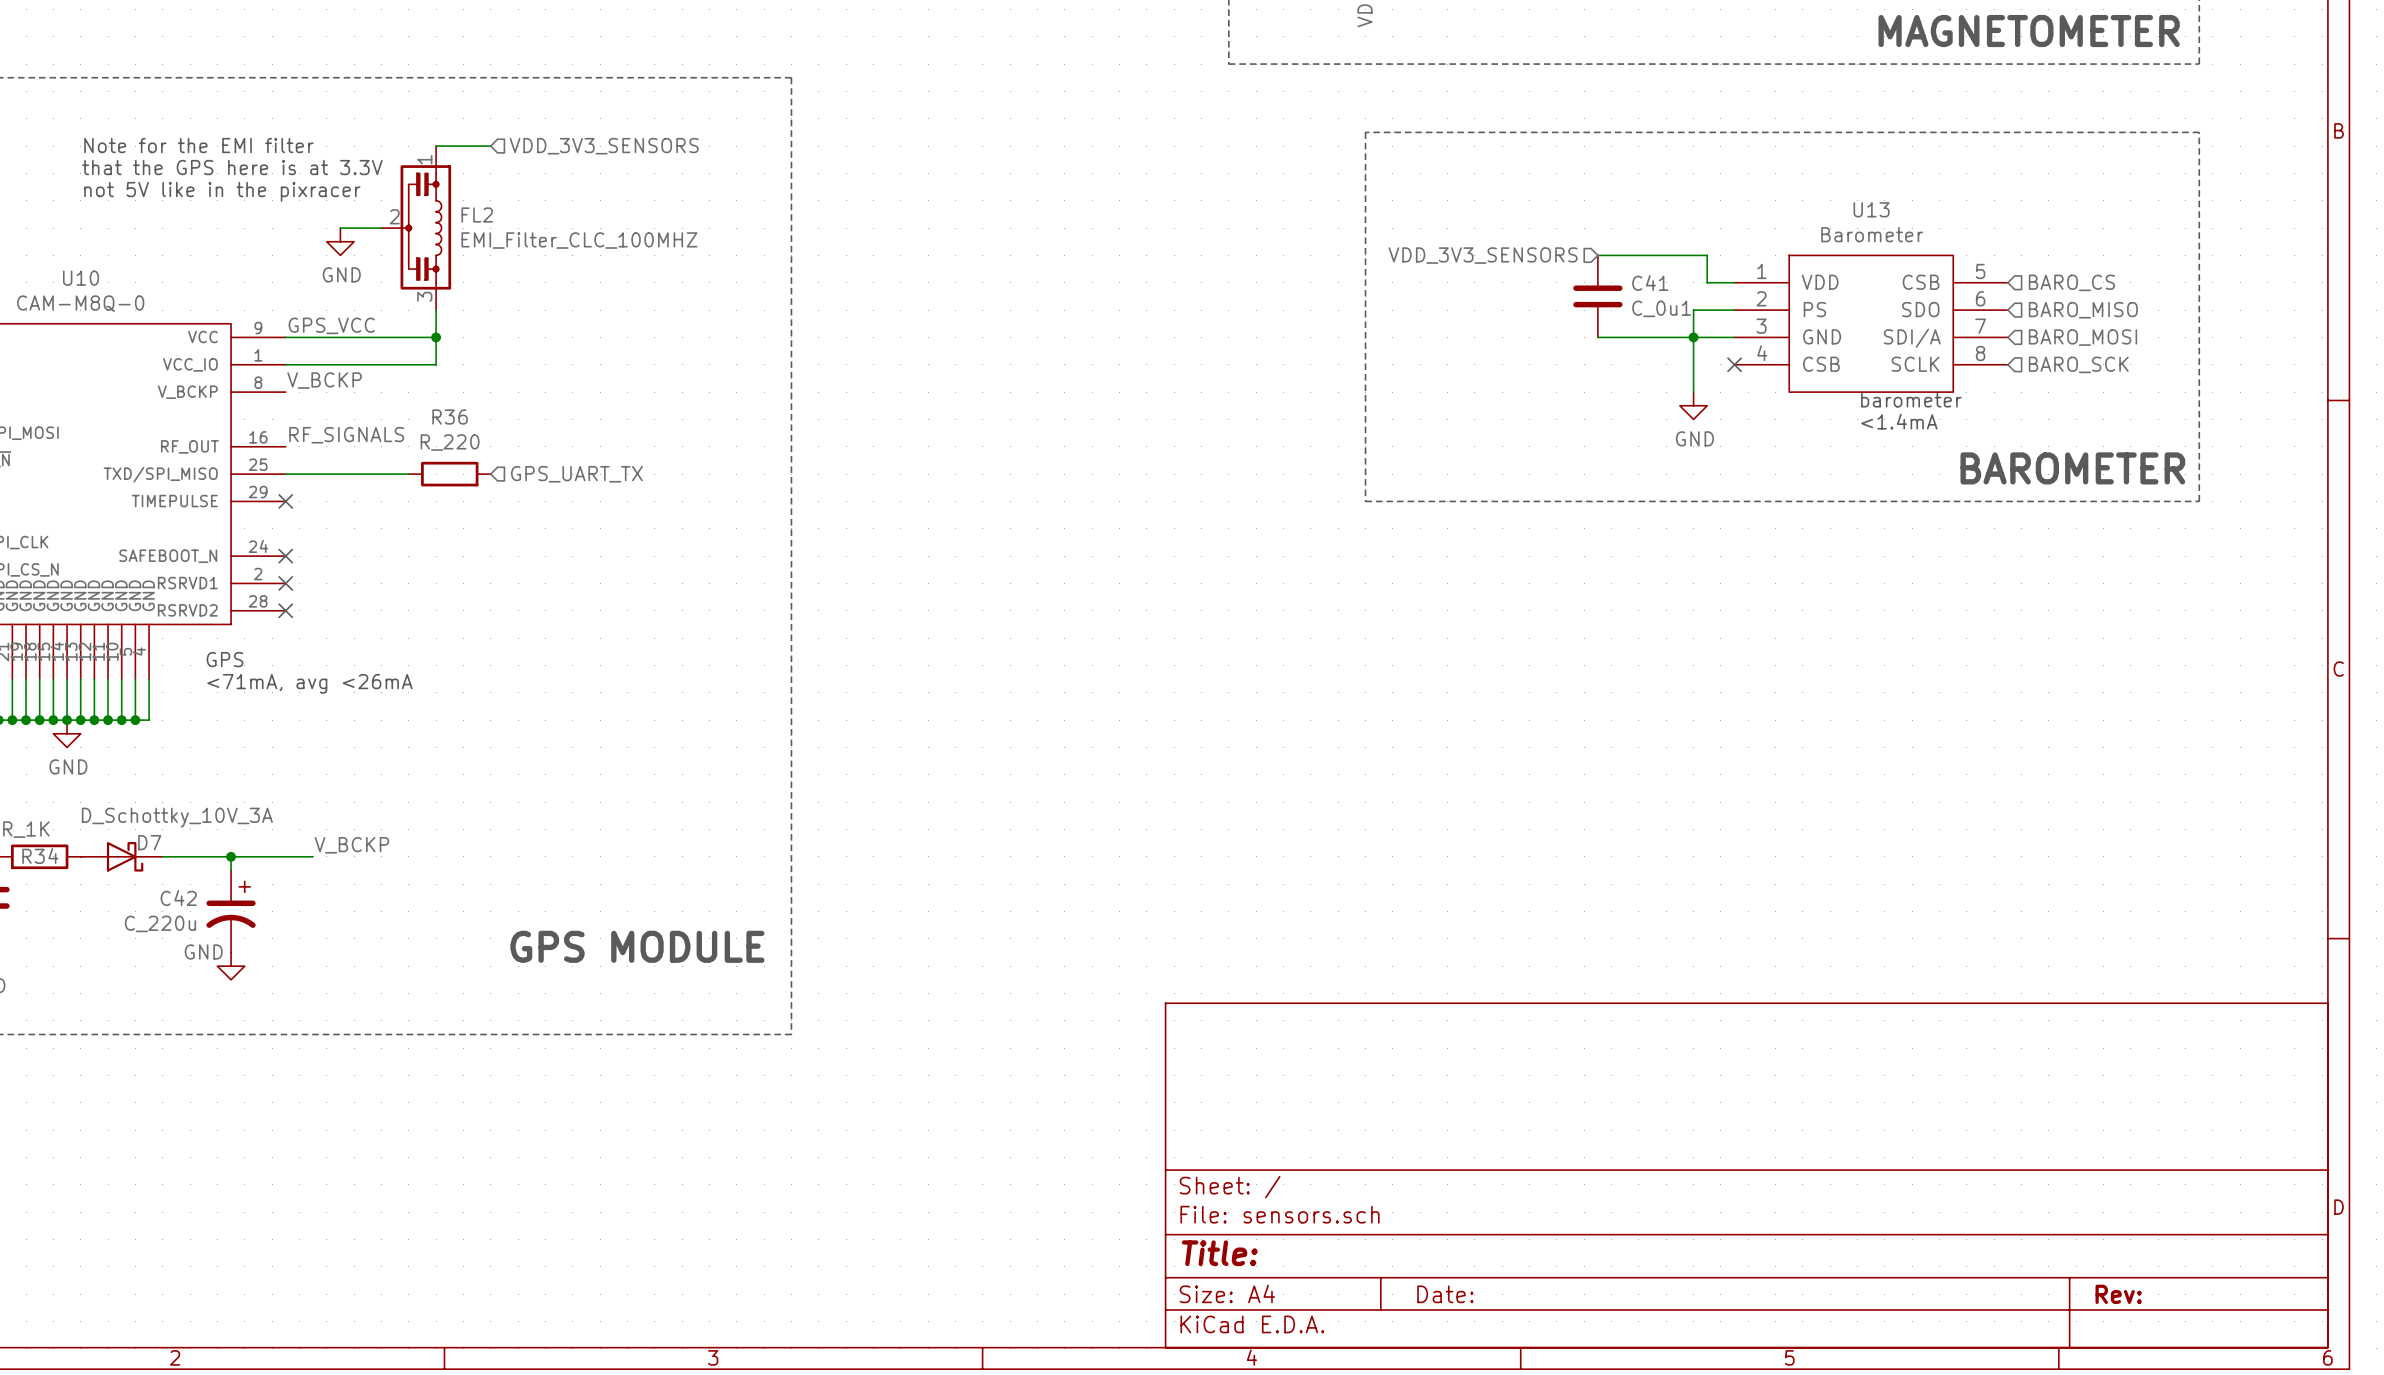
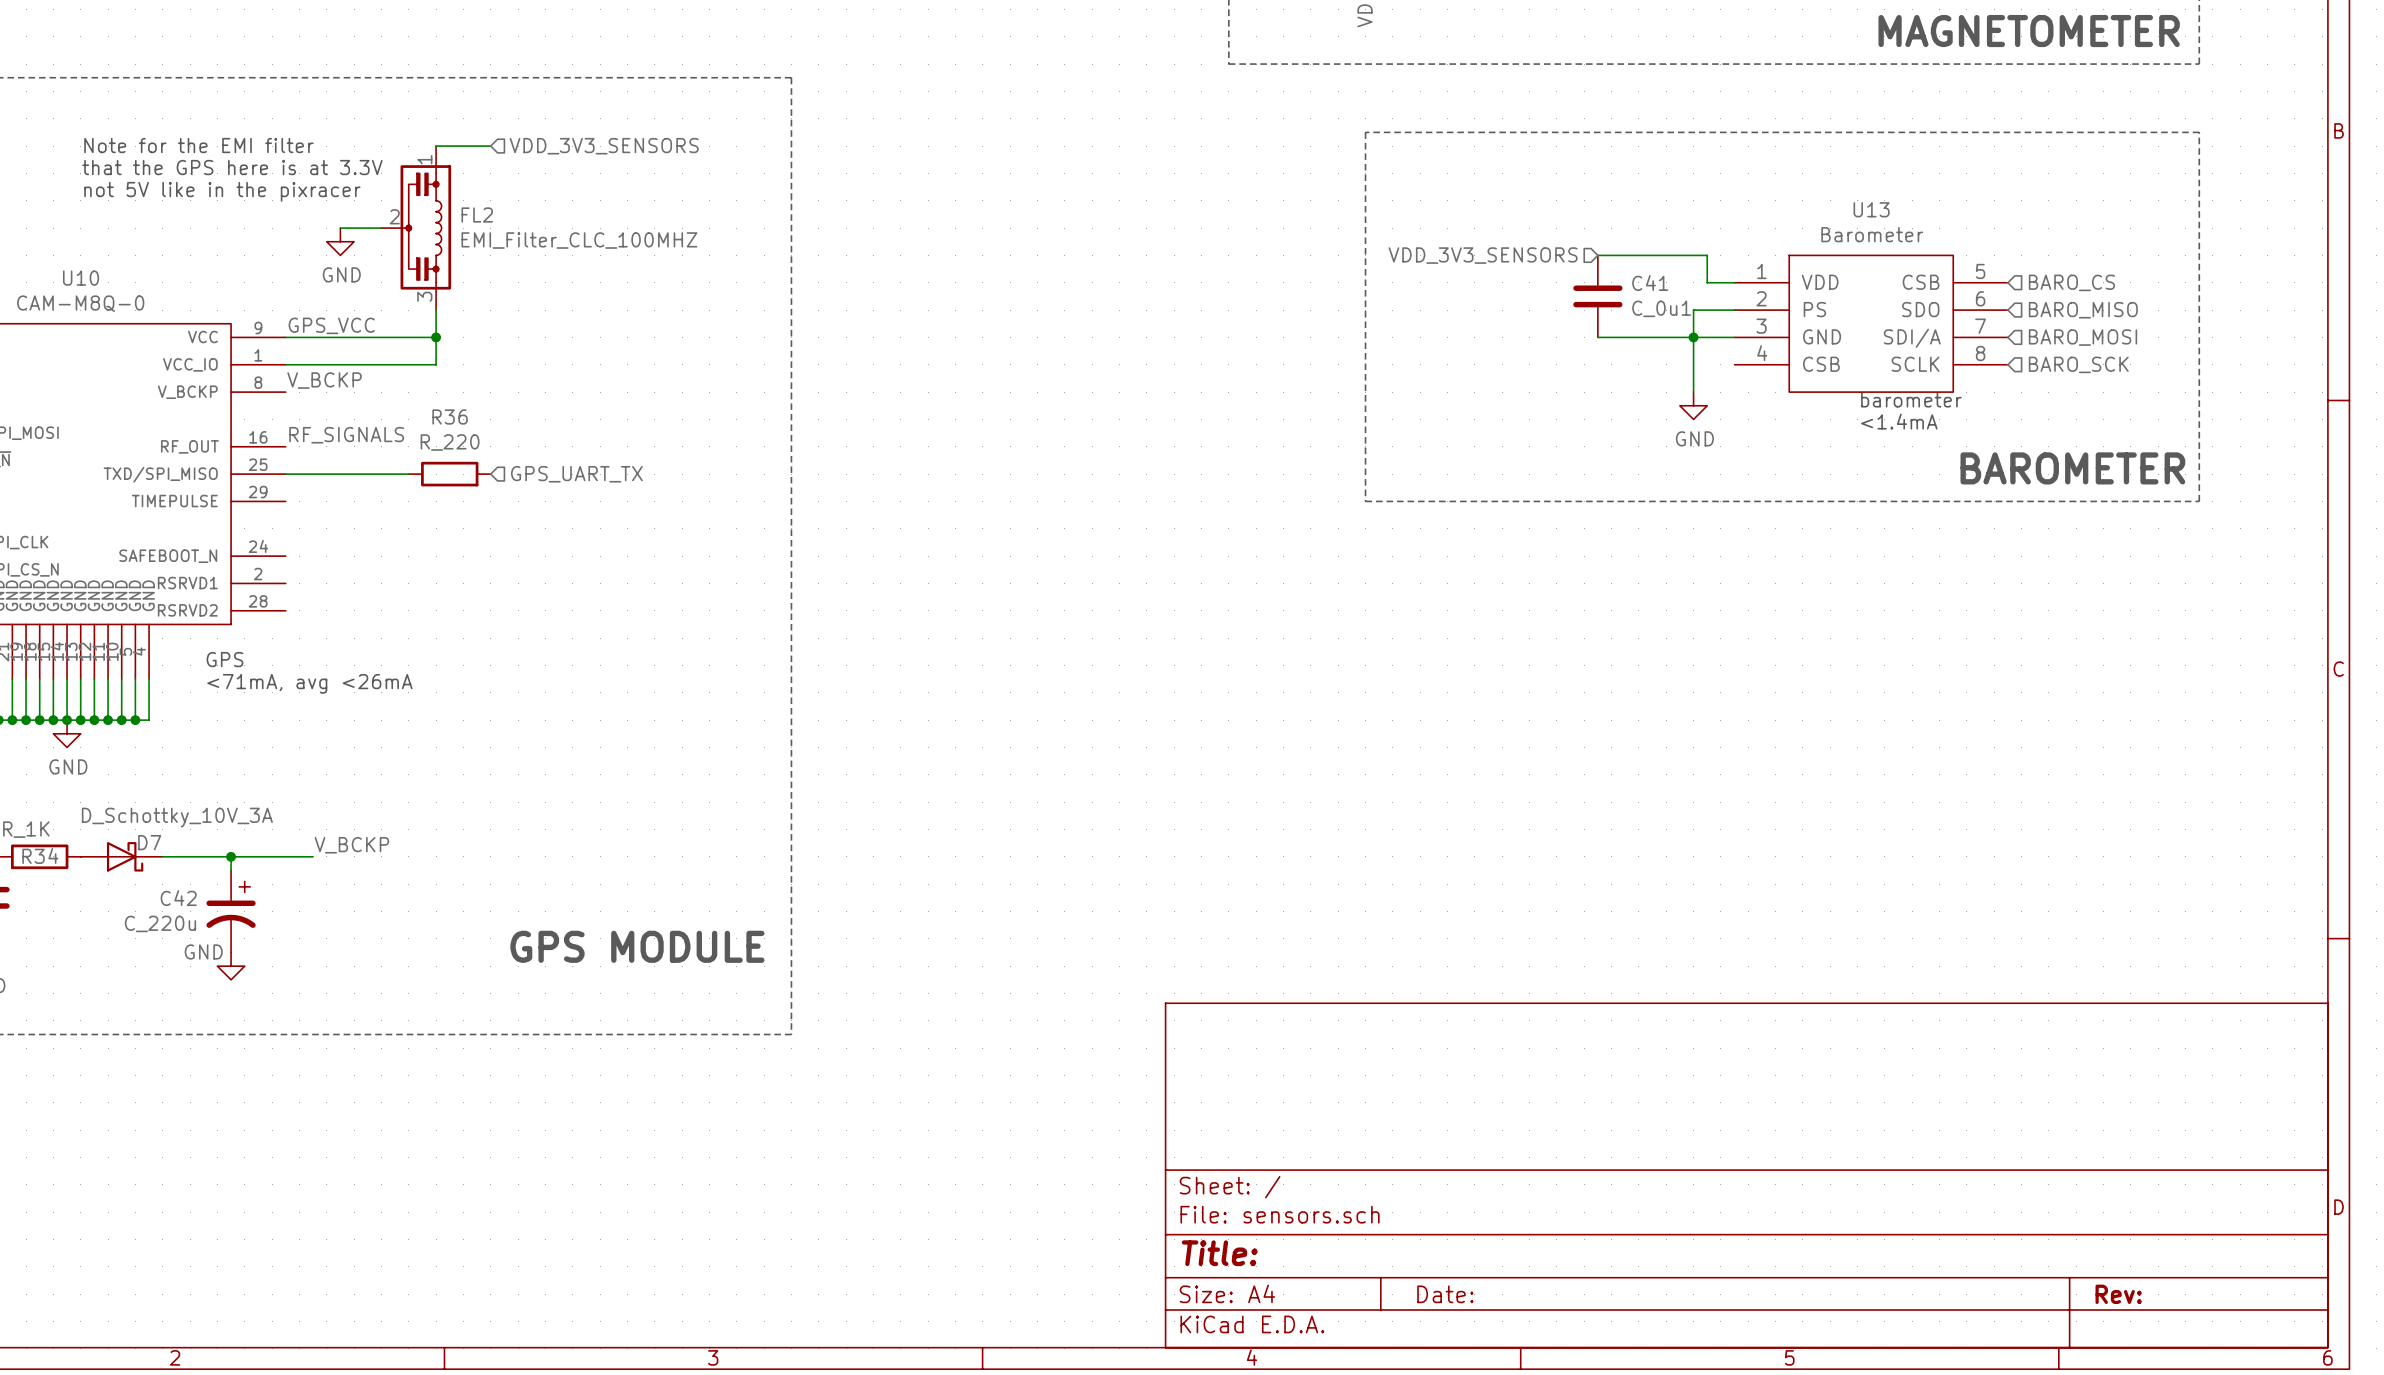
no-connect mark: (1734, 364) -> none
no-connect mark: (285, 501) -> none
no-connect mark: (285, 556) -> none
no-connect mark: (285, 583) -> none
no-connect mark: (285, 610) -> none

